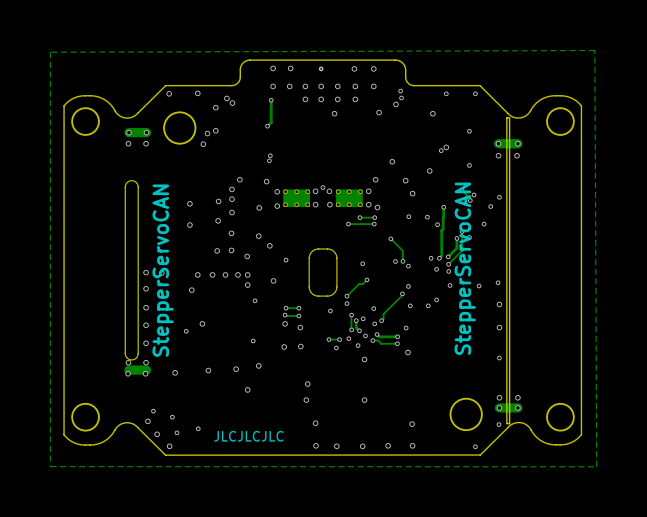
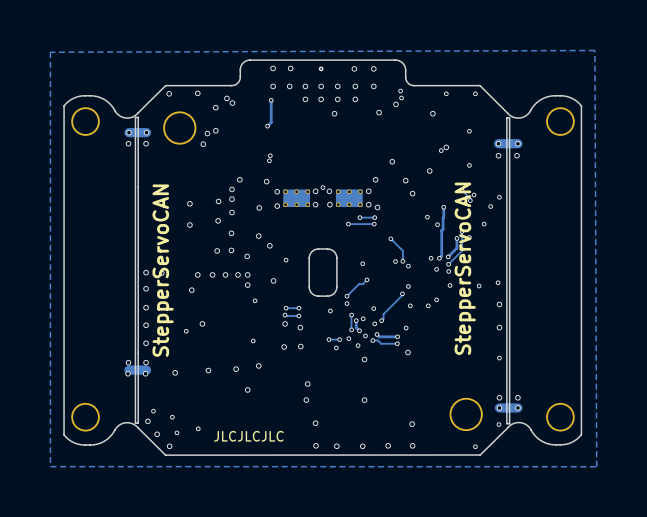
board edge: (138, 187) (136, 182) (131, 180) (127, 182) (125, 187) (125, 354) (128, 358) (132, 359) (136, 357) (138, 353) -> (138, 187) (138, 117) (135, 117) (135, 423) (138, 423) (138, 353)
via: (408, 216) -> none

